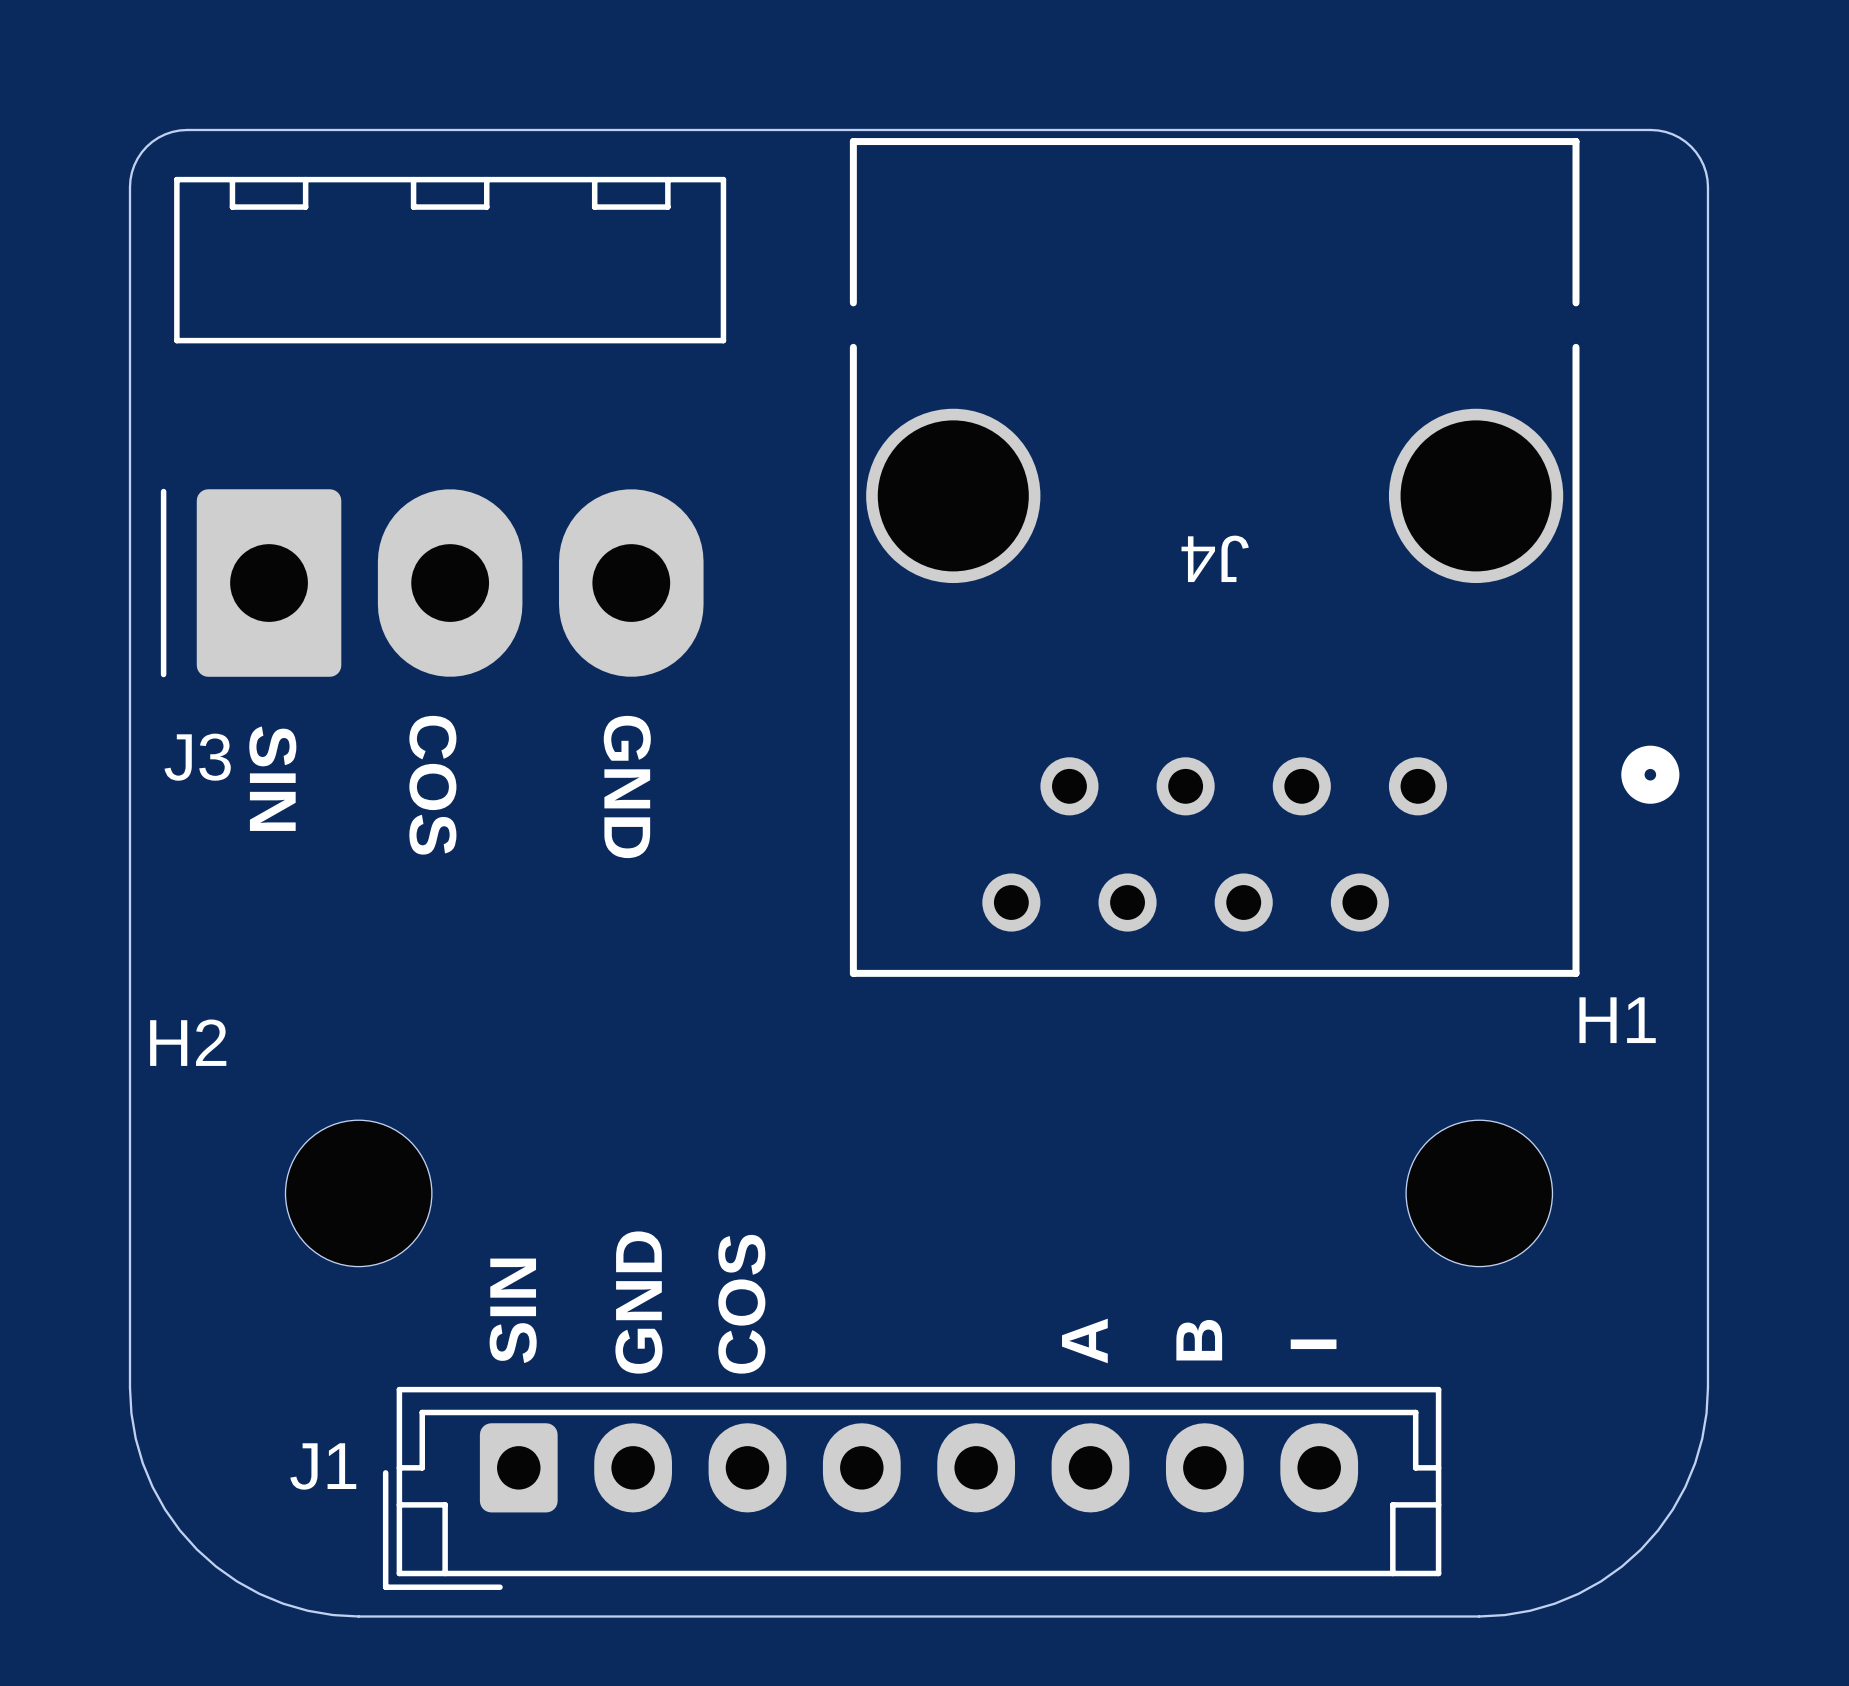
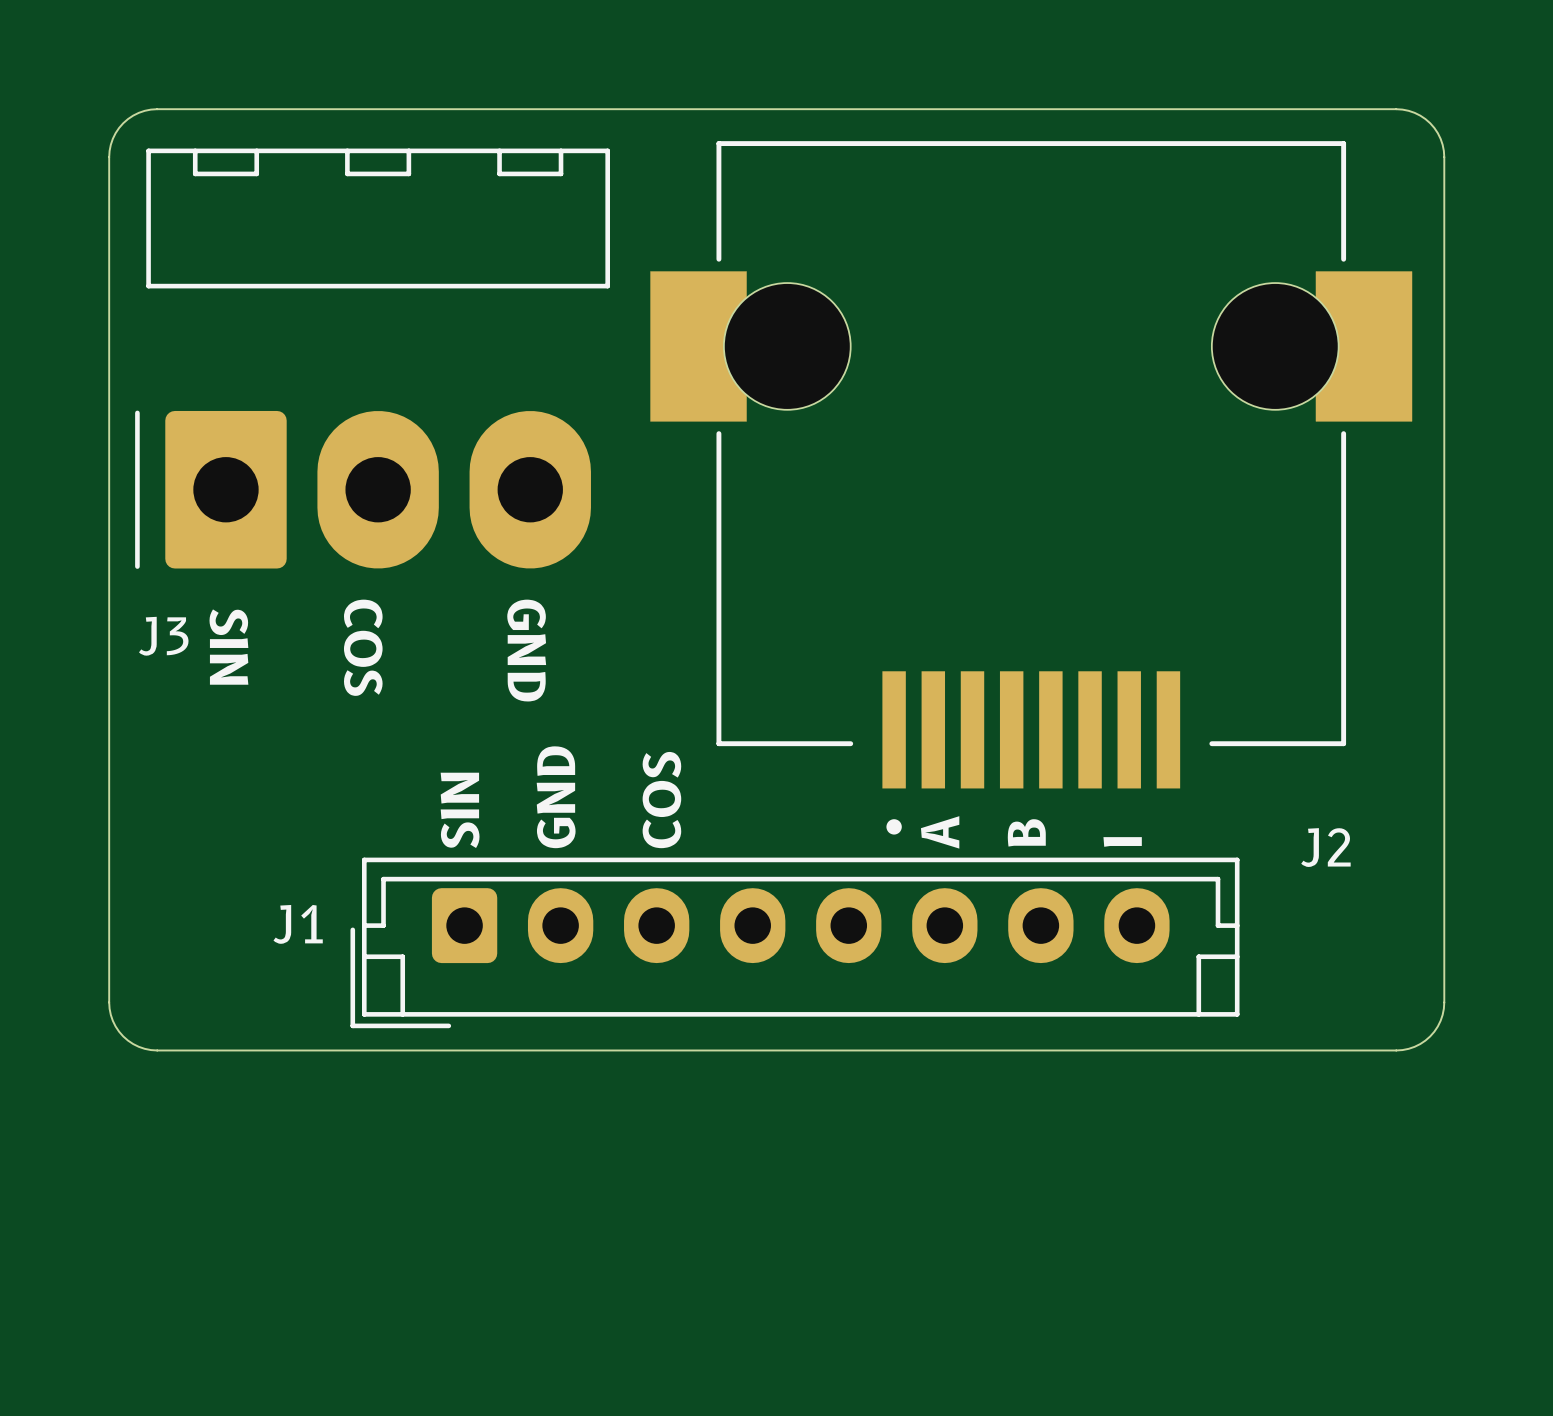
board edge: (1650, 129) (1672, 134) (1691, 146) (1703, 165) (1707, 187) (1707, 1387) (1702, 1438) (1685, 1487) (1658, 1530) (1621, 1566) (1600, 1581) (1554, 1603) (1530, 1610) (1479, 1616) (358, 1616) (307, 1610) (259, 1593) (216, 1566) (179, 1530) (152, 1487) (142, 1463) (131, 1413) (129, 1193) -> (1386, 109) (1408, 110) (1425, 119) (1434, 127) (1440, 138) (1444, 157) (1444, 1002) (1442, 1014) (1437, 1026) (1425, 1040) (1414, 1046) (1396, 1050) (157, 1050) (138, 1046) (123, 1036) (112, 1020) (109, 1002)
J4: (1264, 557) -> none
J2: none -> (1031, 487)
H2: (358, 1193) -> none
H1: (1479, 1193) -> none
text position: GND (638, 1302) -> GND (556, 797)
text position: COS (741, 1304) -> COS (661, 800)
text position: SIN (513, 1310) -> SIN (460, 810)
text position: A (1084, 1340) -> A (940, 832)
text position: B (1199, 1340) -> B (1026, 832)
text position: I (1313, 1344) -> I (1122, 841)
J1 position: (912, 1488) -> (794, 942)

